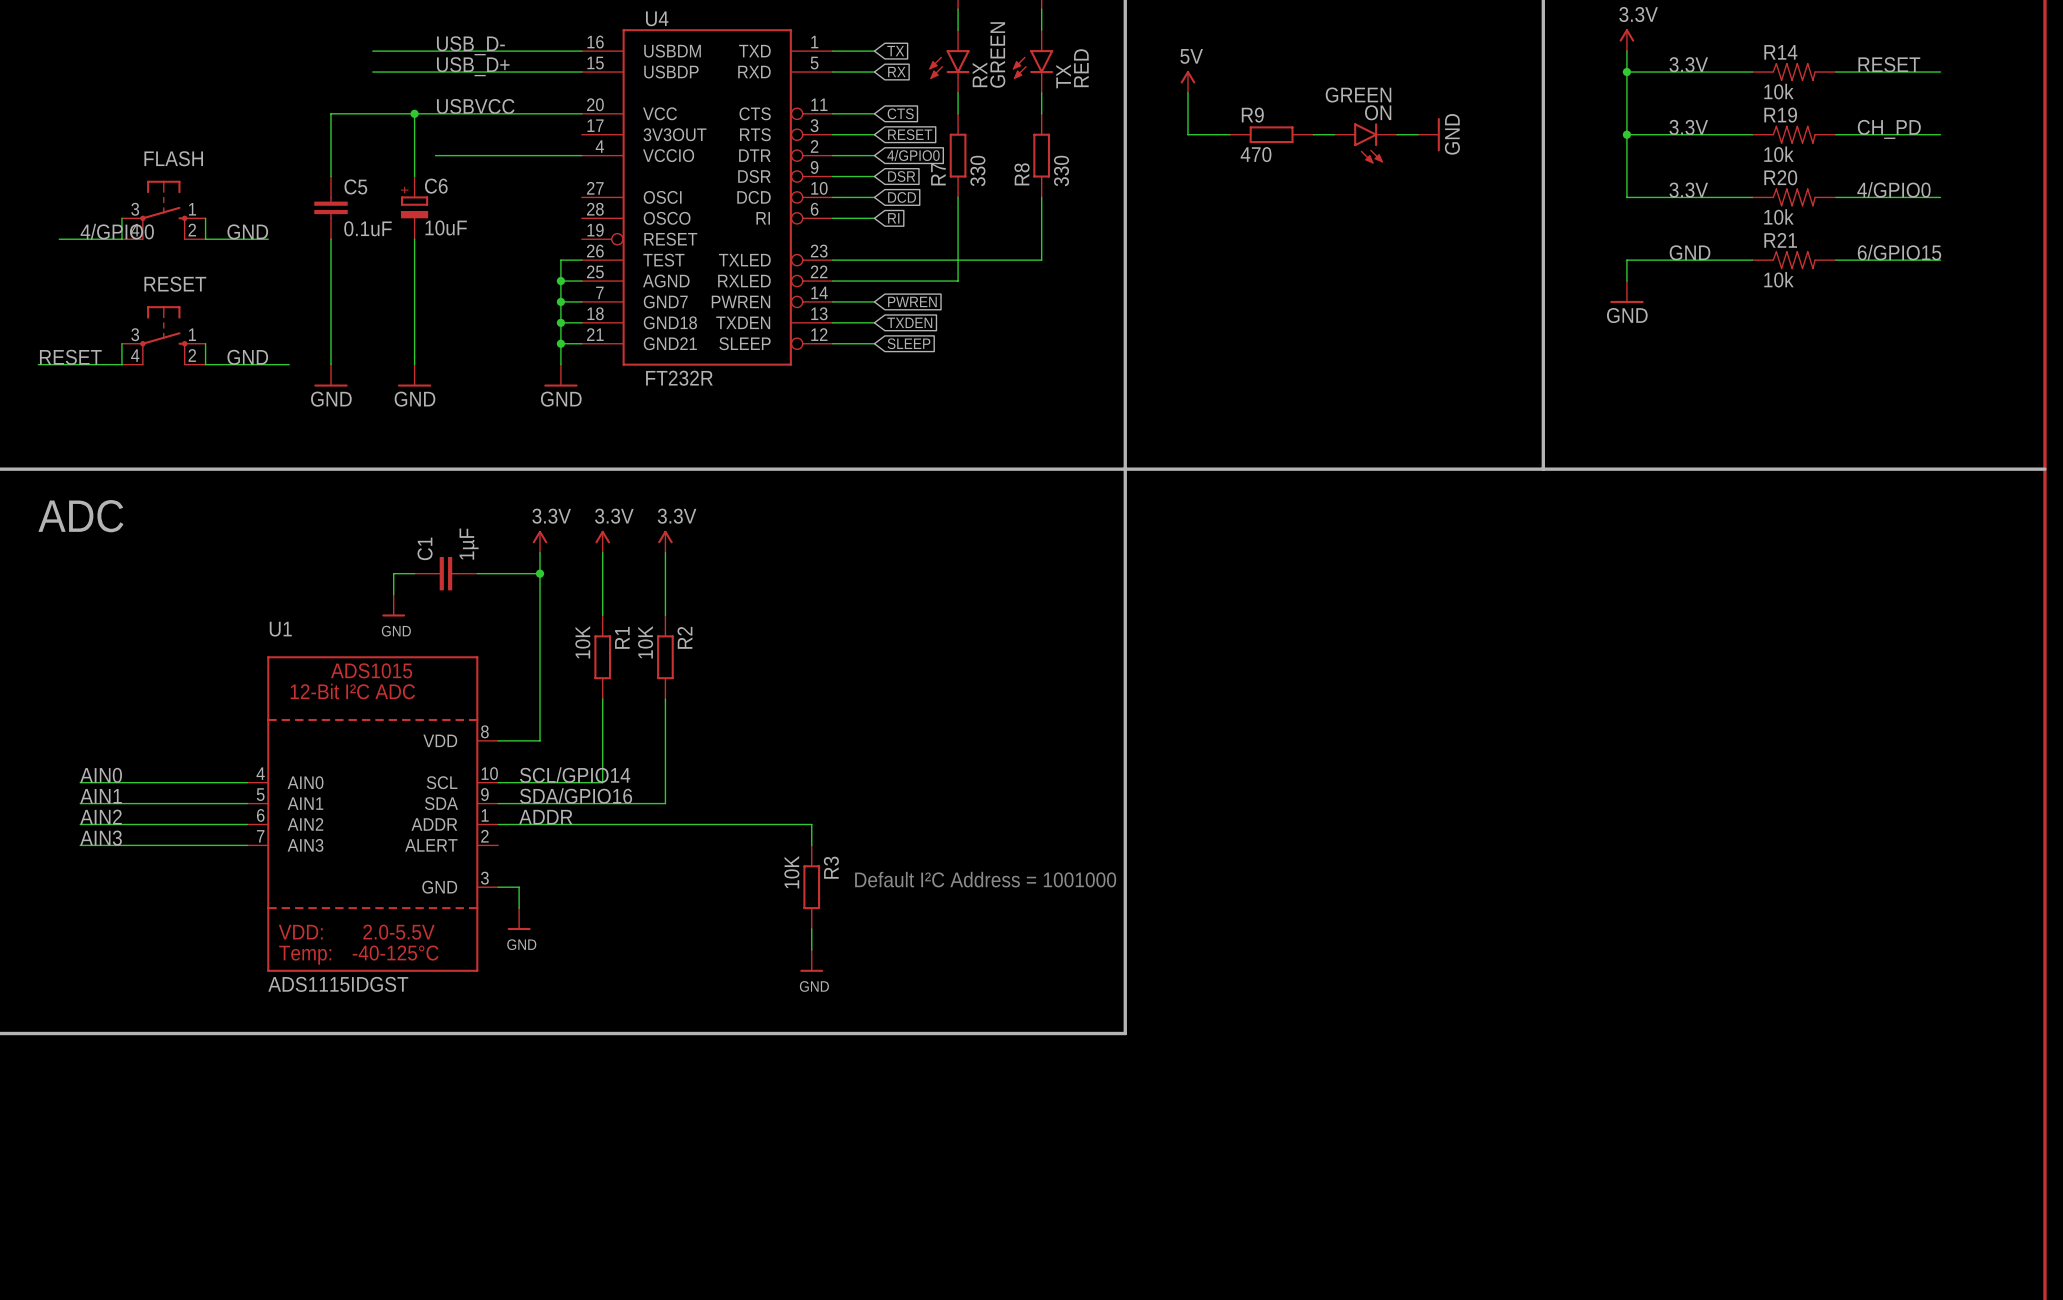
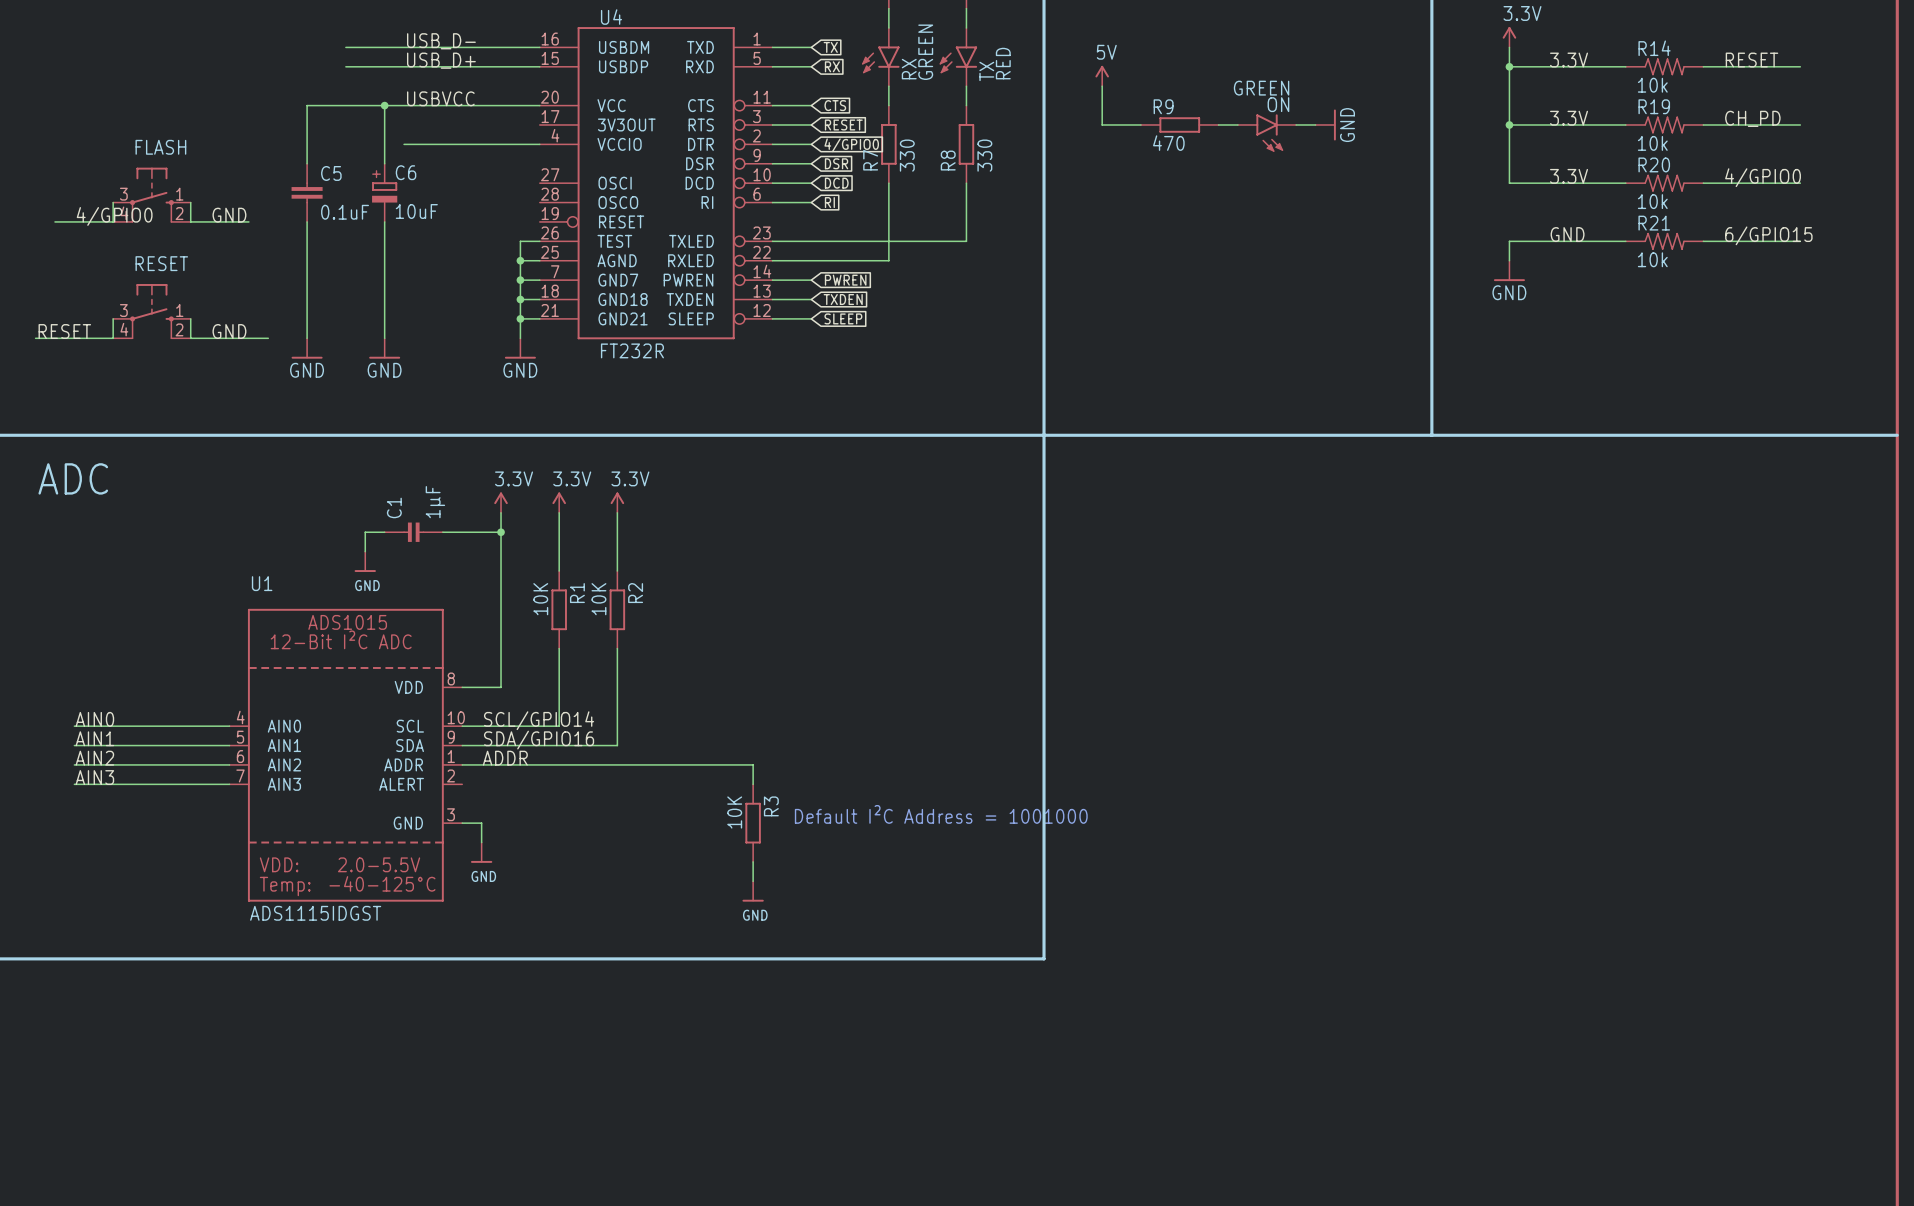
C1 symbol: [414, 556, 478, 591] -> [384, 522, 443, 542]

